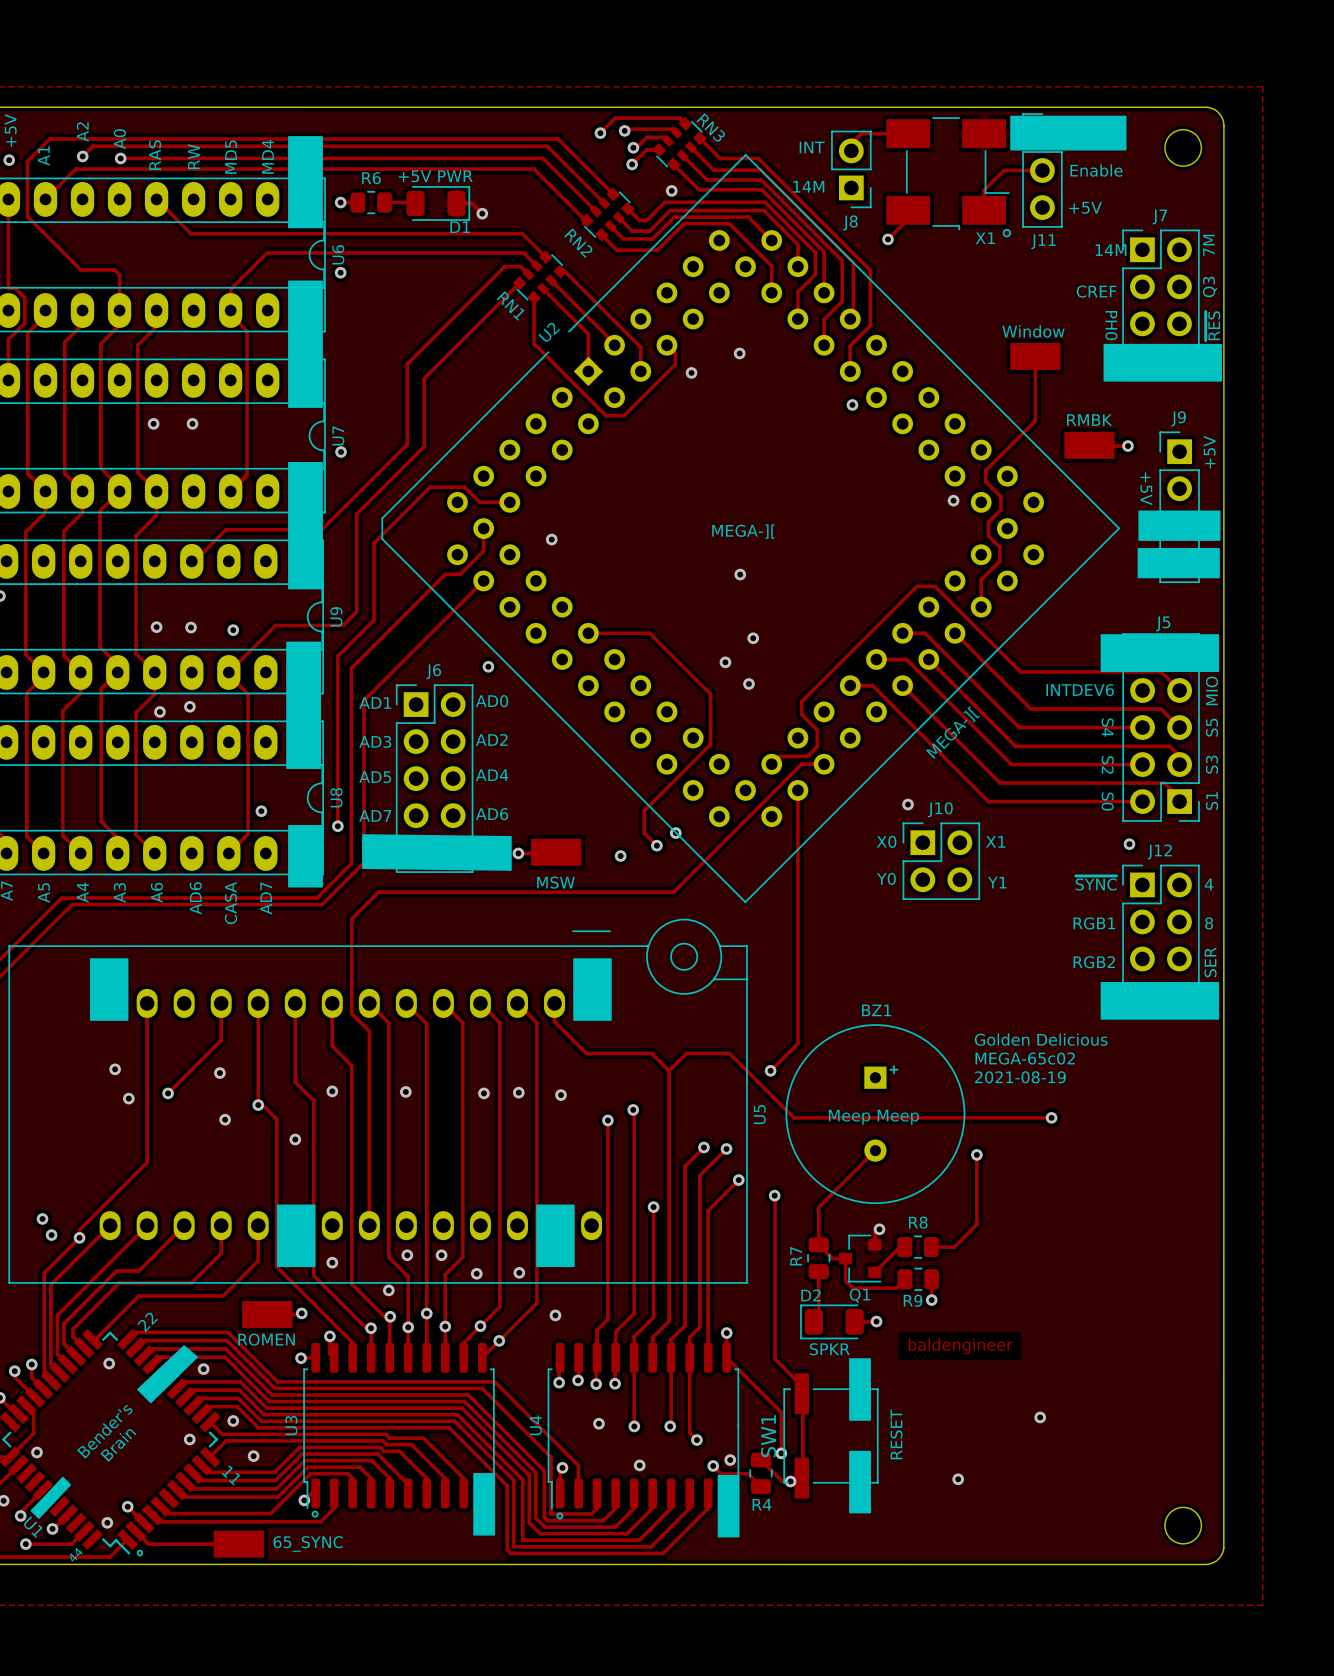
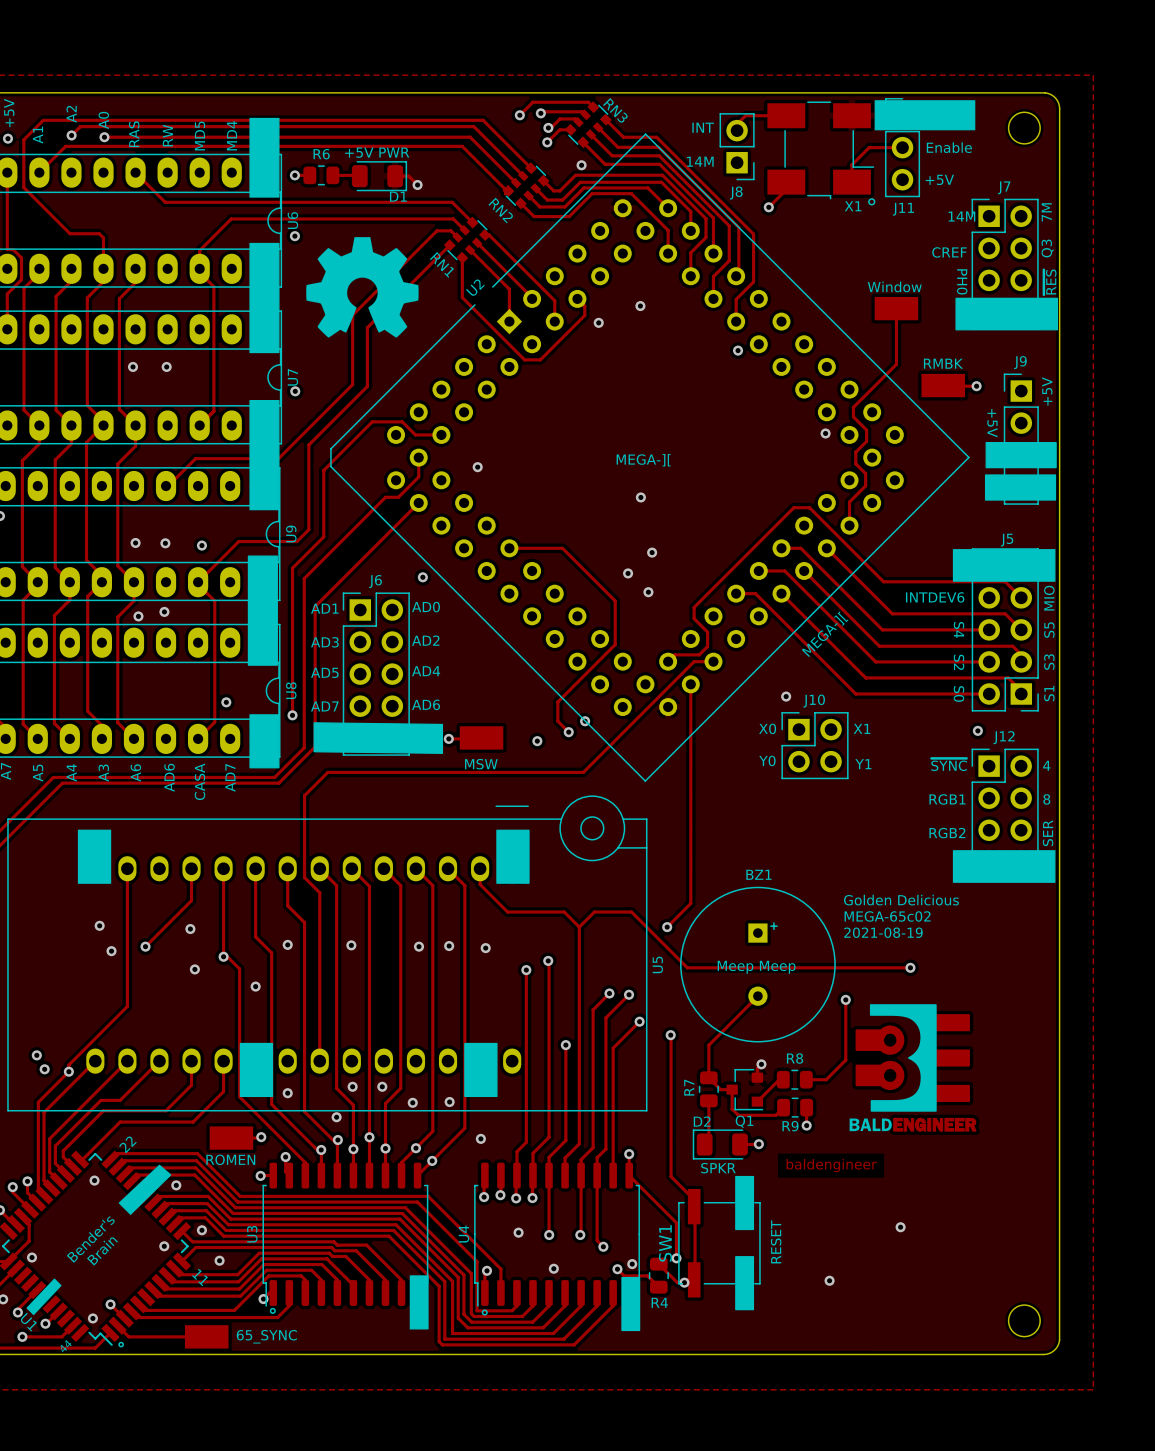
drawing: none -> [306, 237, 419, 338]
drawing: none -> [849, 1004, 977, 1132]

